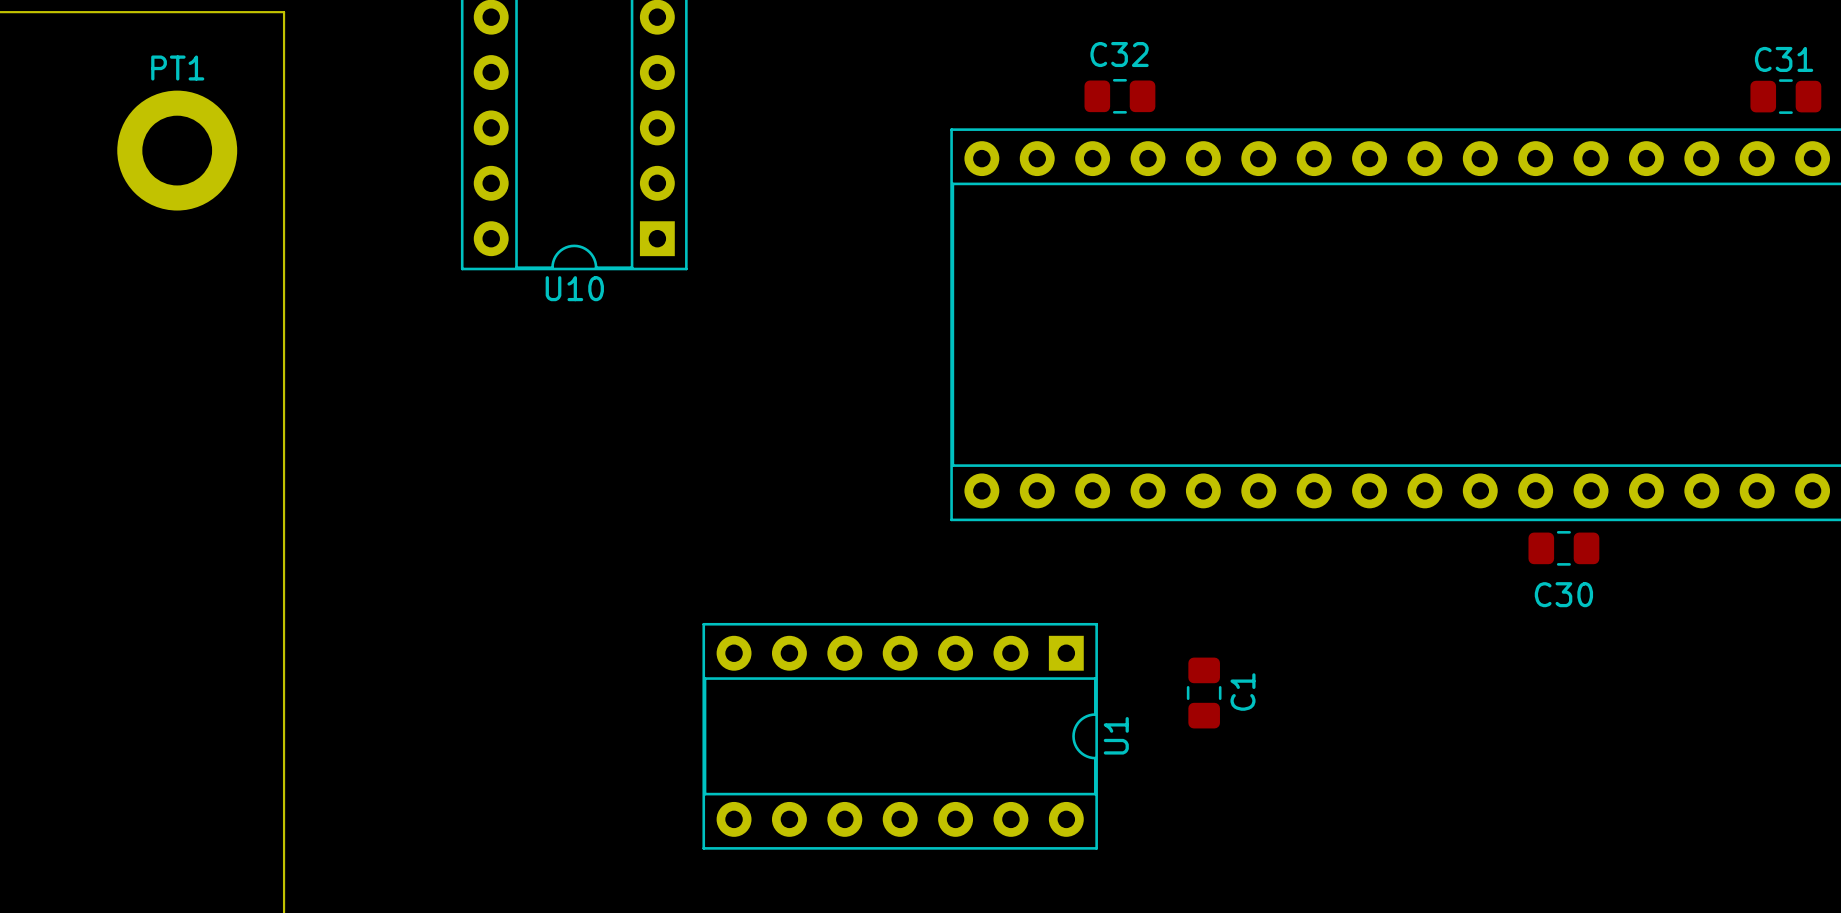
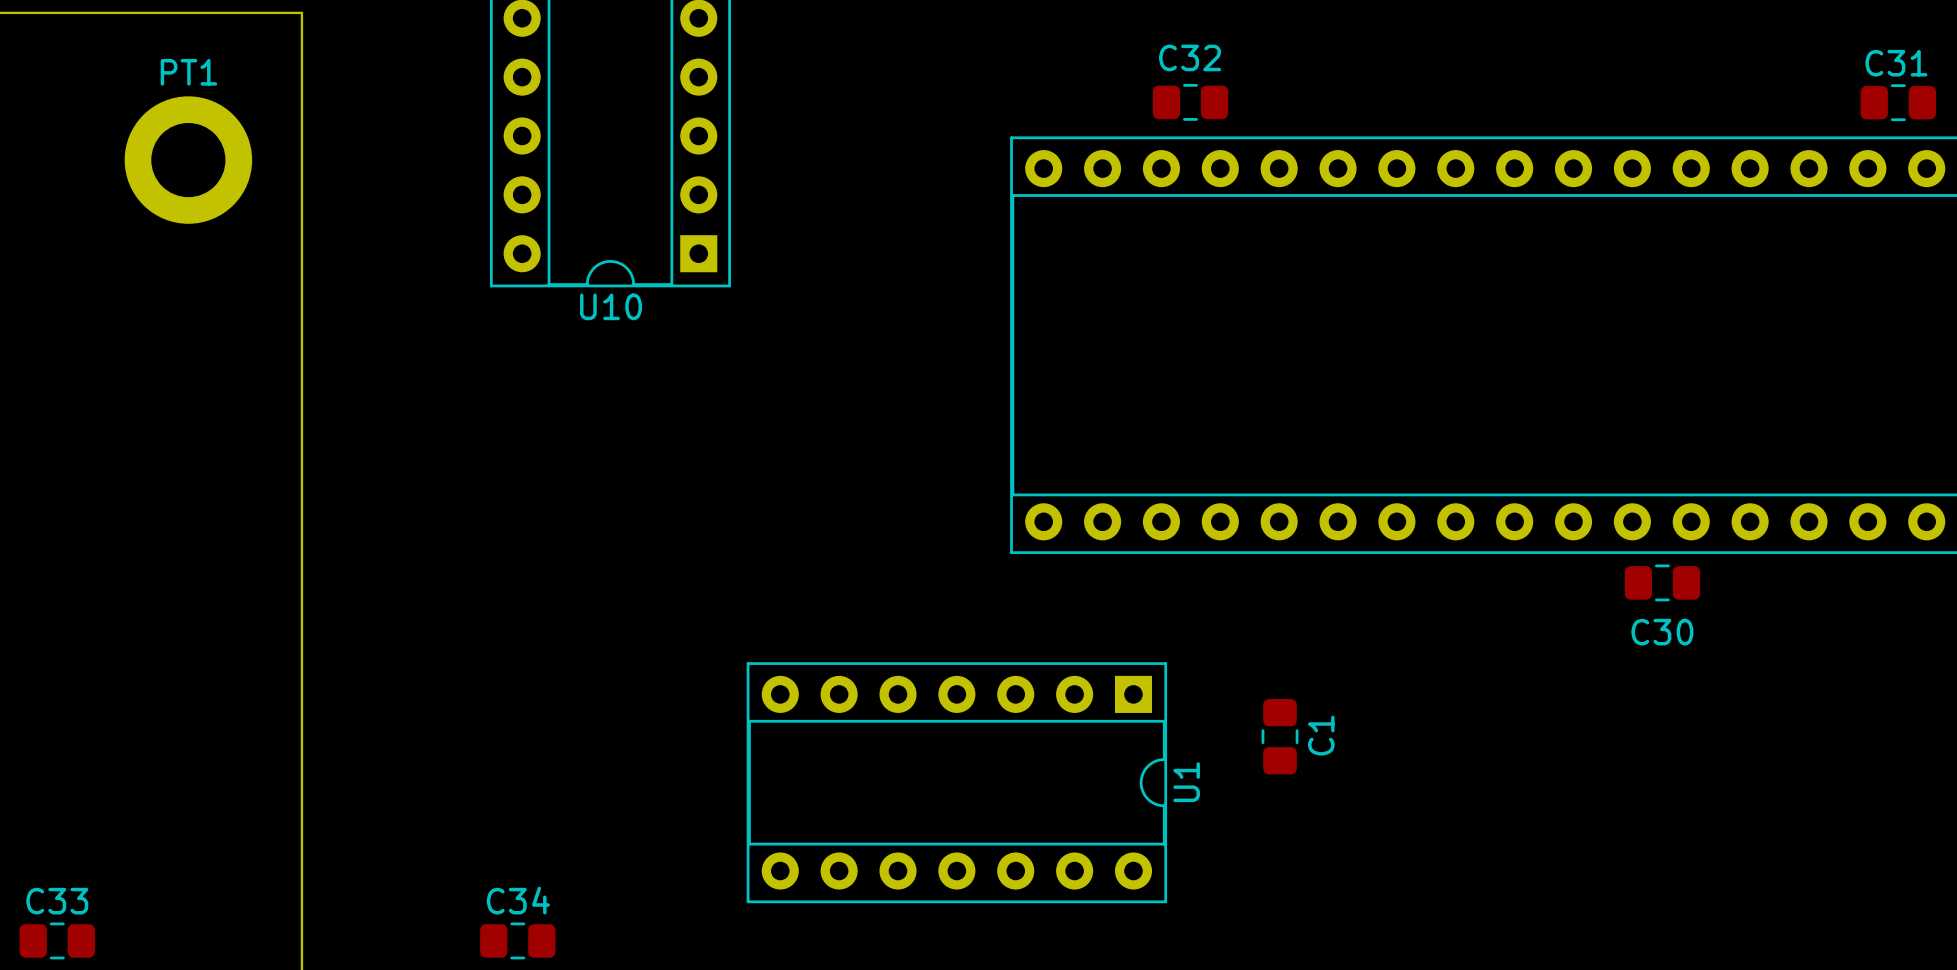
C33: none -> (57, 940)
C34: none -> (517, 940)

